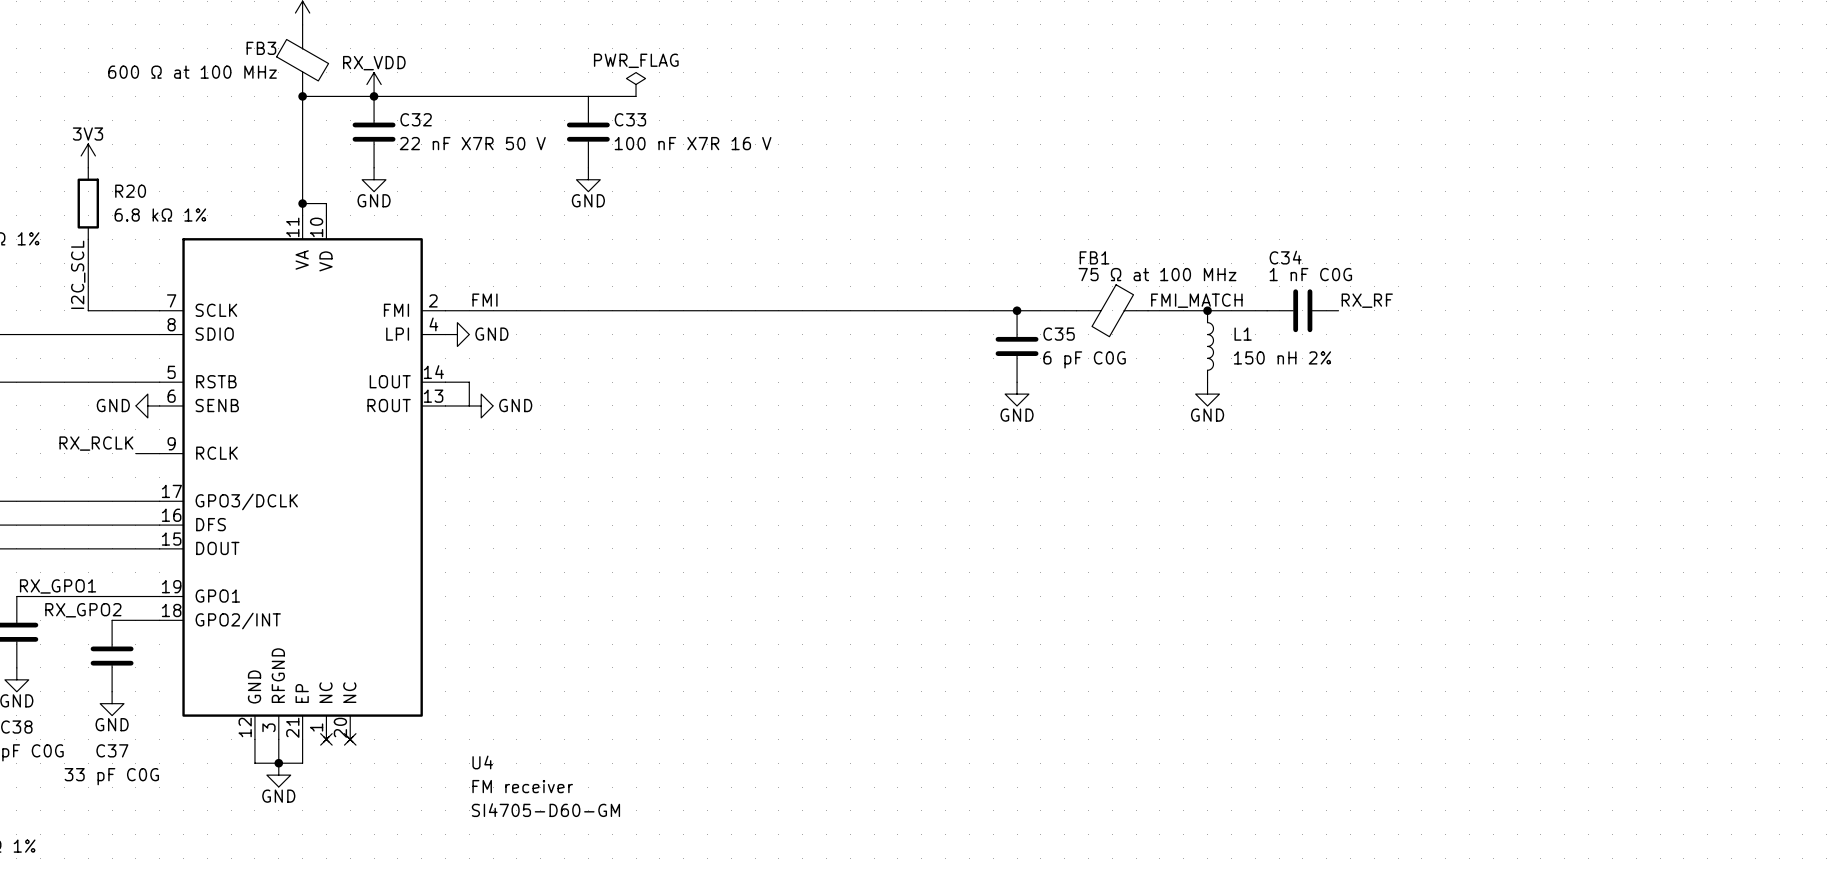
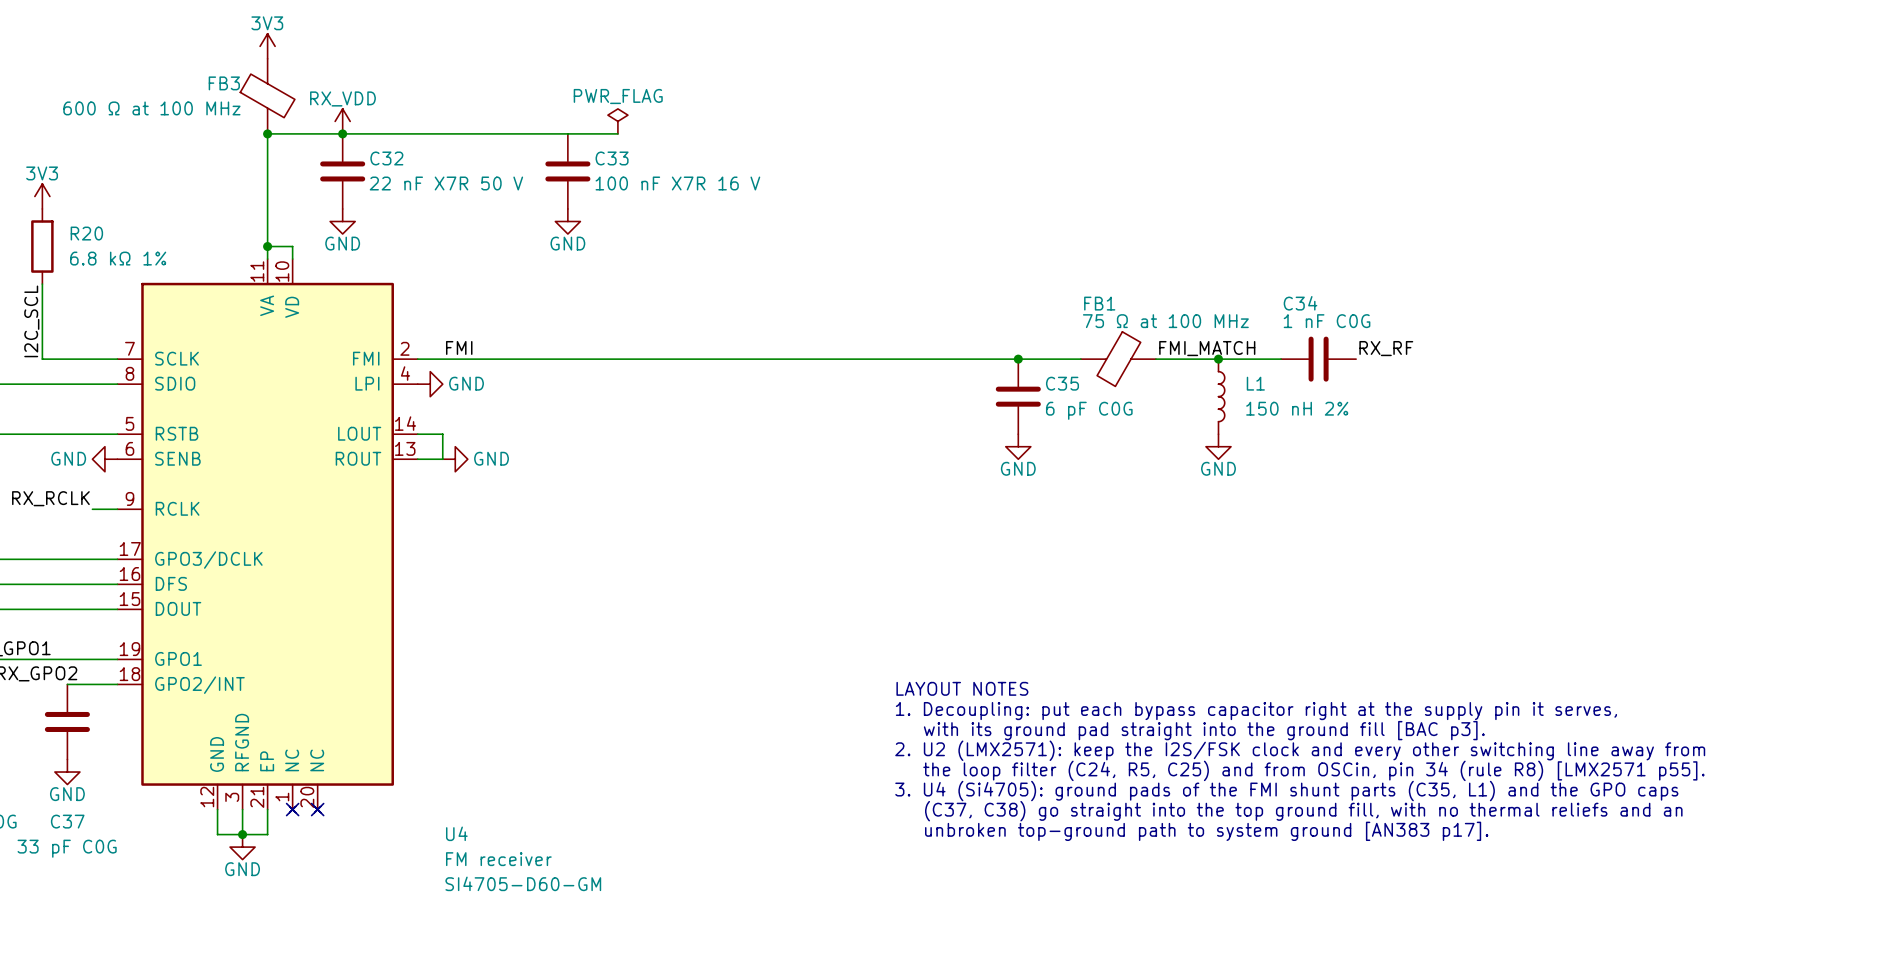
text: none -> LAYOUT NOTES (962, 688)
text: none -> 1. Decoupling: put each bypass capacitor right at the supply pin it serves, (1256, 711)
text: none -> with its ground pad straight into the ground fill [BAC p3]. (1204, 730)
text: none -> 2. U2 (LMX2571): keep the I2S/FSK clock and every other switching line away from (1300, 750)
text: none -> the loop filter (C24, R5, C25) and from OSCin, pin 34 (rule R8) [LMX2571 p55]. (1313, 770)
text: none -> 3. U4 (Si4705): ground pads of the FMI shunt parts (C35, L1) and the GPO caps (1286, 791)
text: none -> (C37, C38) go straight into the top ground fill, with no thermal reliefs and an (1303, 811)
text: none -> unbroken top-ground path to system ground [AN383 p17]. (1206, 831)

